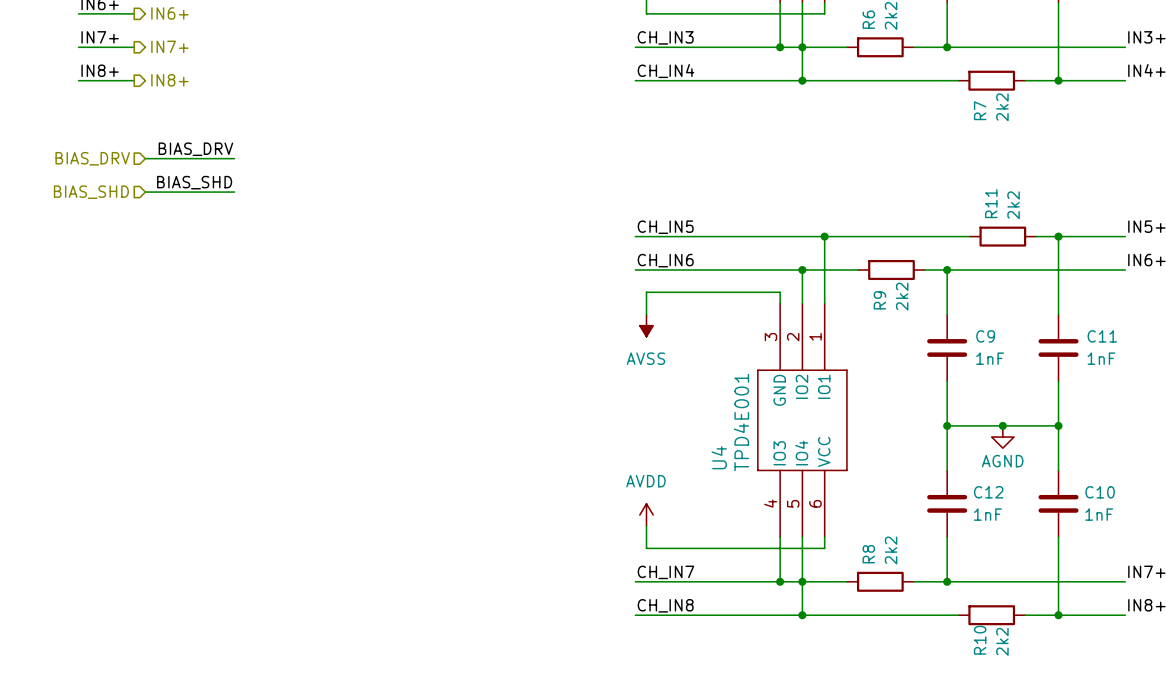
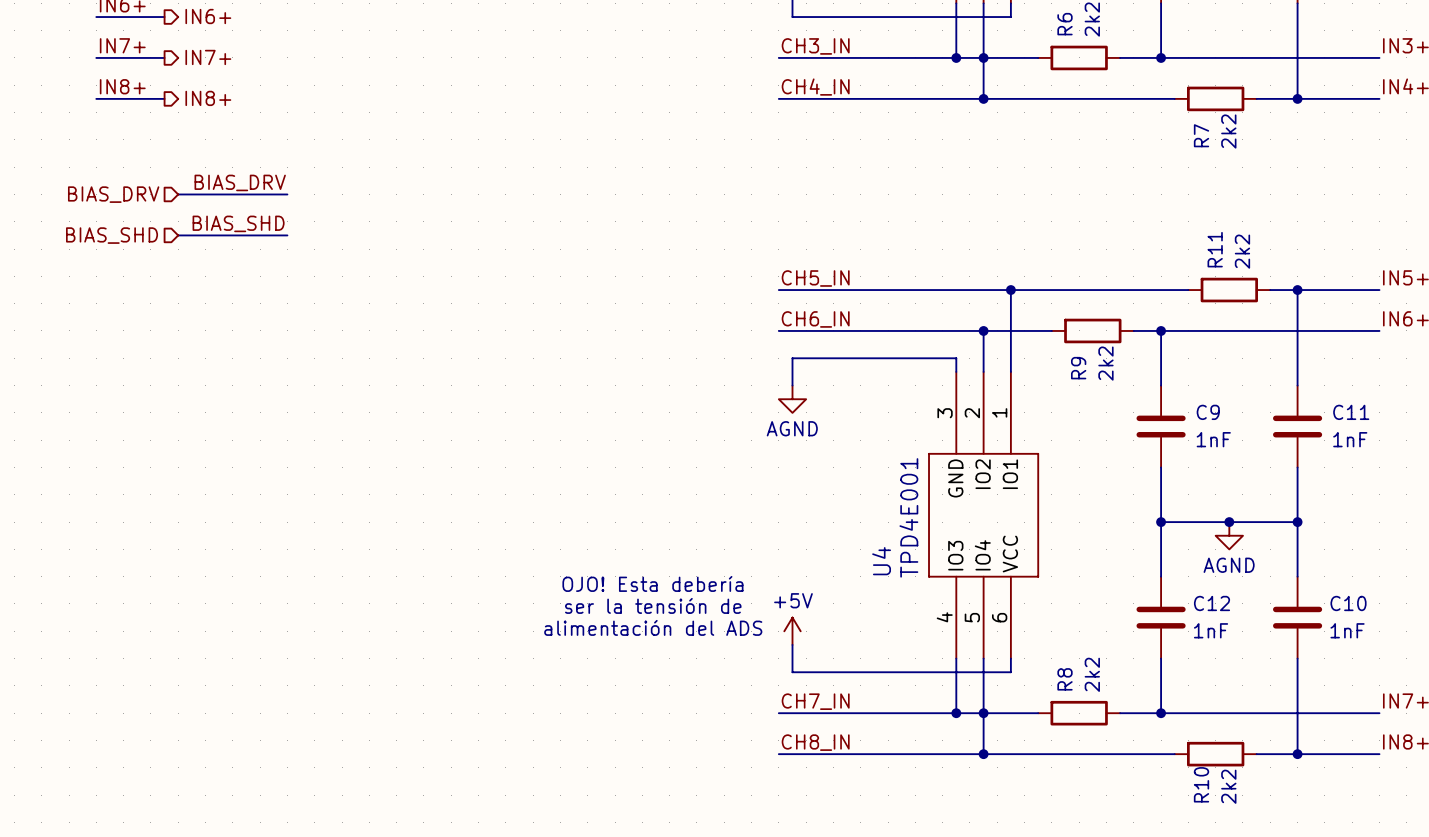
label: CH_IN3 (665, 37) -> CH3_IN (815, 46)
label: CH_IN4 (665, 71) -> CH4_IN (815, 87)
label: CH_IN5 (665, 227) -> CH5_IN (815, 278)
label: CH_IN6 (665, 260) -> CH6_IN (815, 319)
power symbol: AVSS (646, 325) -> AGND (792, 399)
text: none -> OJO! Esta debería (652, 583)
text: none -> ser la tensión de (653, 605)
text: none -> alimentación del ADS (653, 627)
power symbol: AVDD (646, 514) -> +5V (792, 631)
label: CH_IN7 (665, 572) -> CH7_IN (815, 701)
label: CH_IN8 (665, 605) -> CH8_IN (815, 742)

